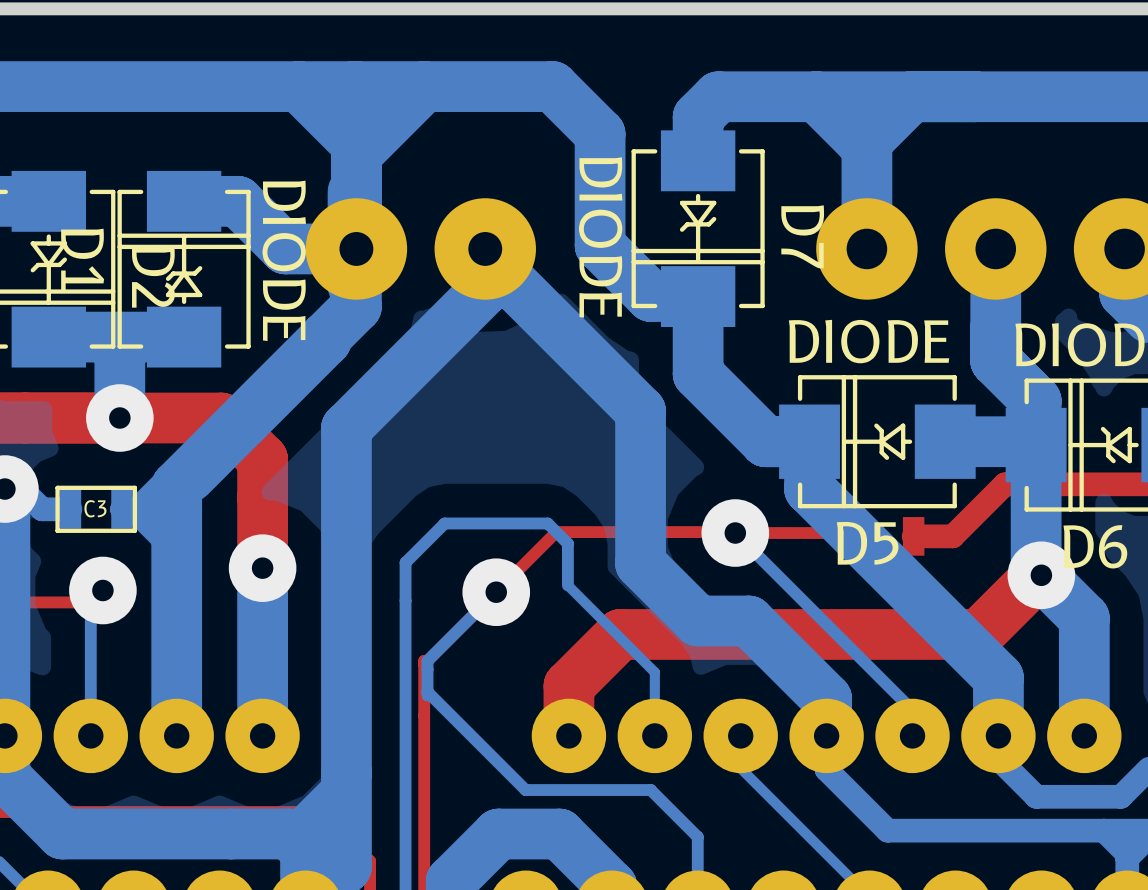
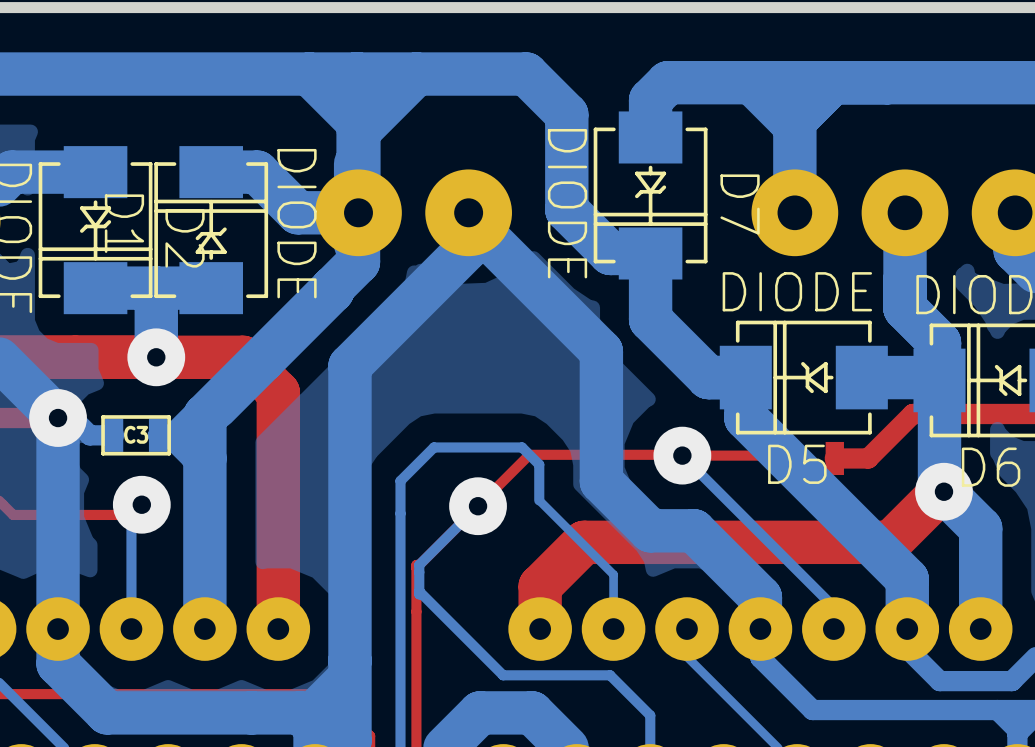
bottom track: (262, 568) (262, 735) -> none
top track: none -> (278, 485) (278, 629)
via: (262, 568) -> none

